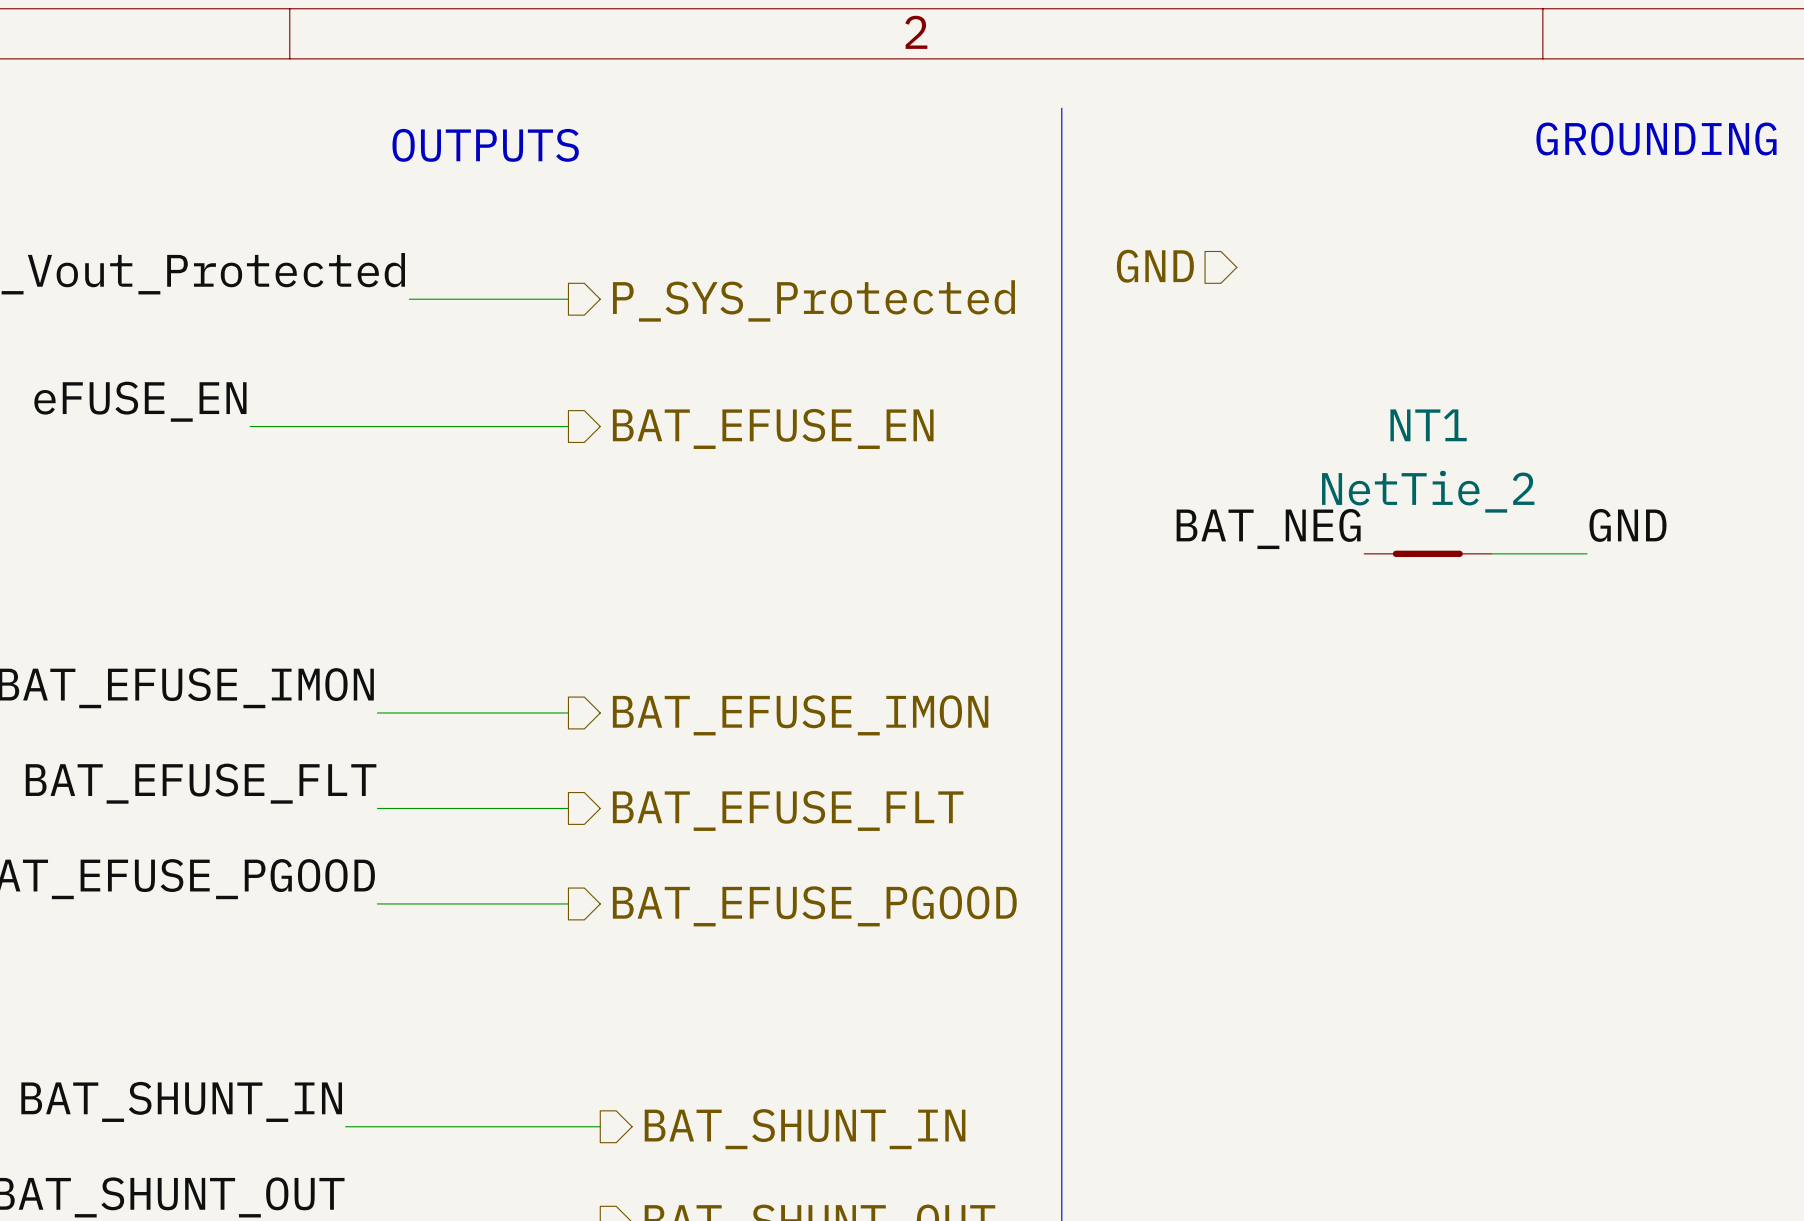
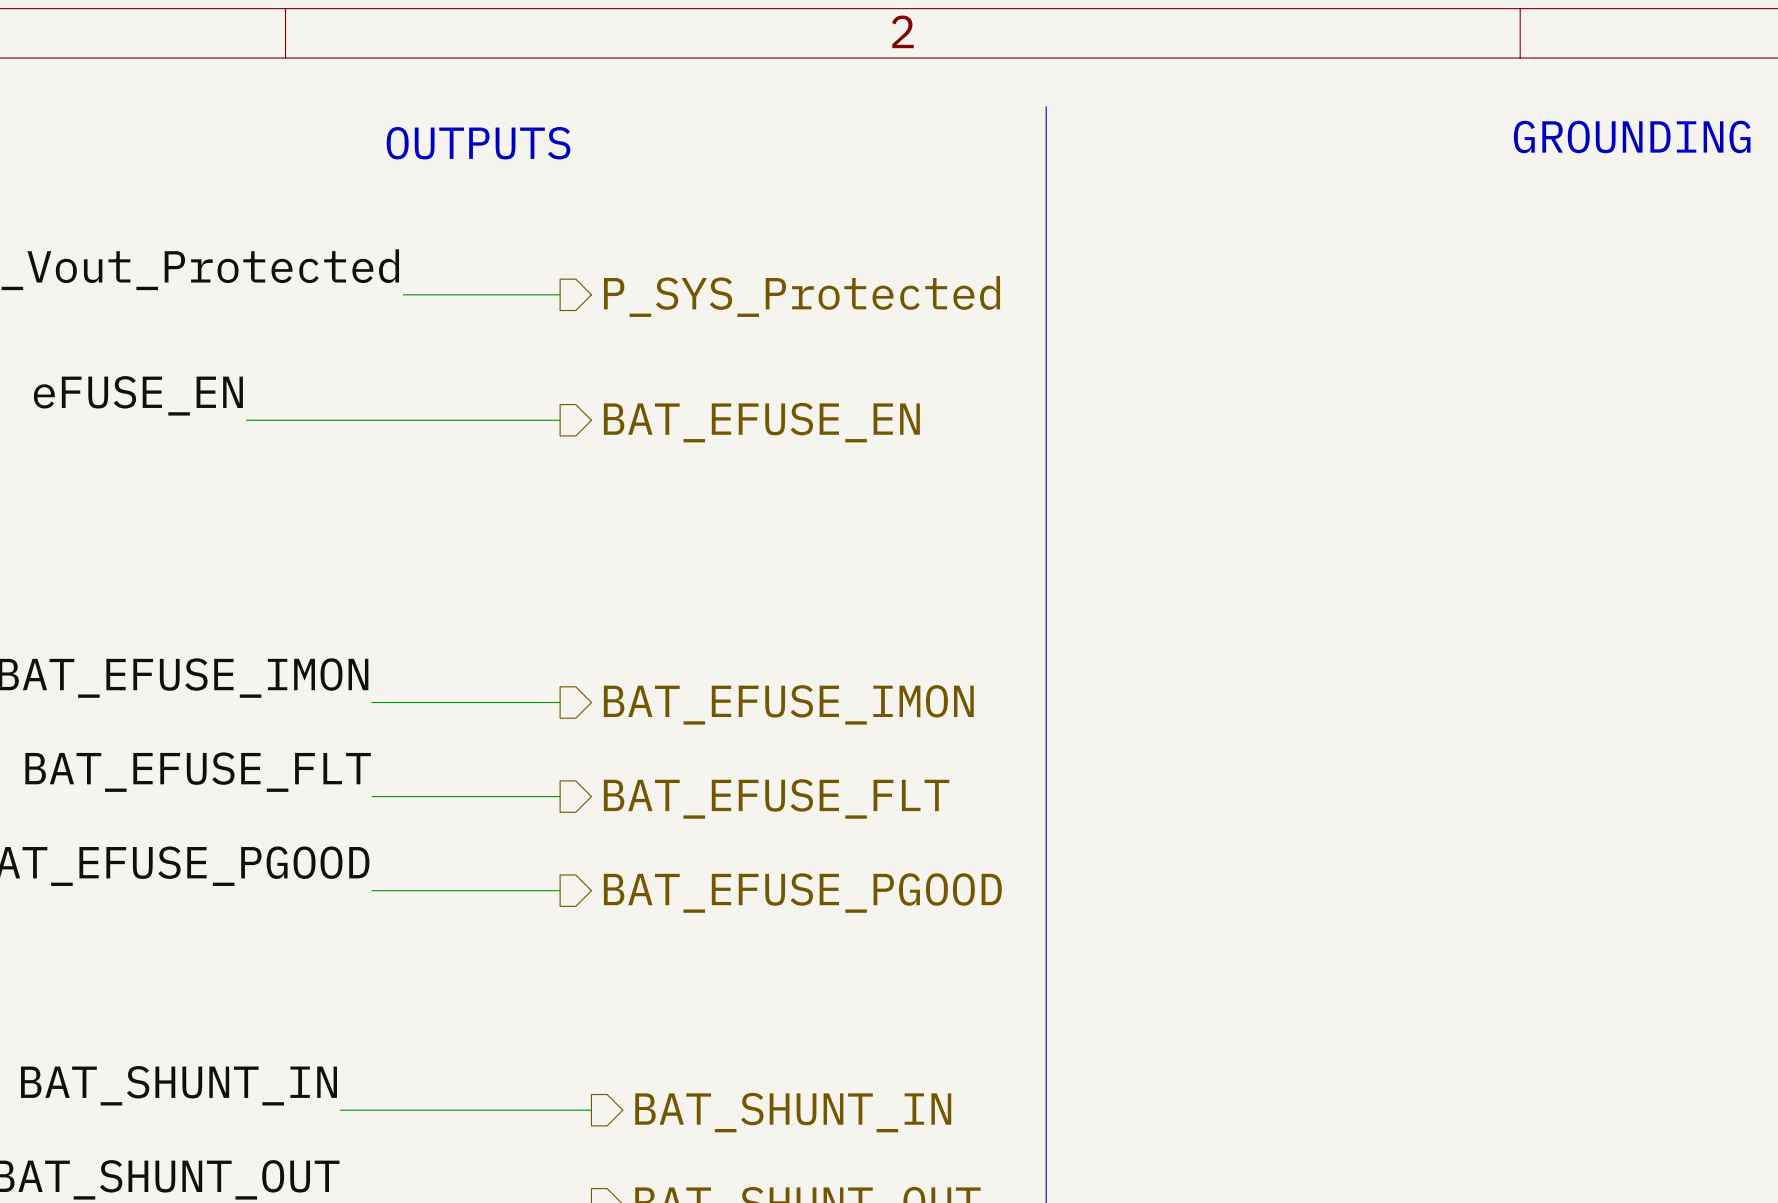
hierarchical label: GND (1155, 266) -> none
label: GND (1628, 525) -> none
label: BAT_NEG (1268, 529) -> none
NT1: NetTie_2 (1427, 553) -> none
wire: (1491, 553) (1586, 553) -> none

